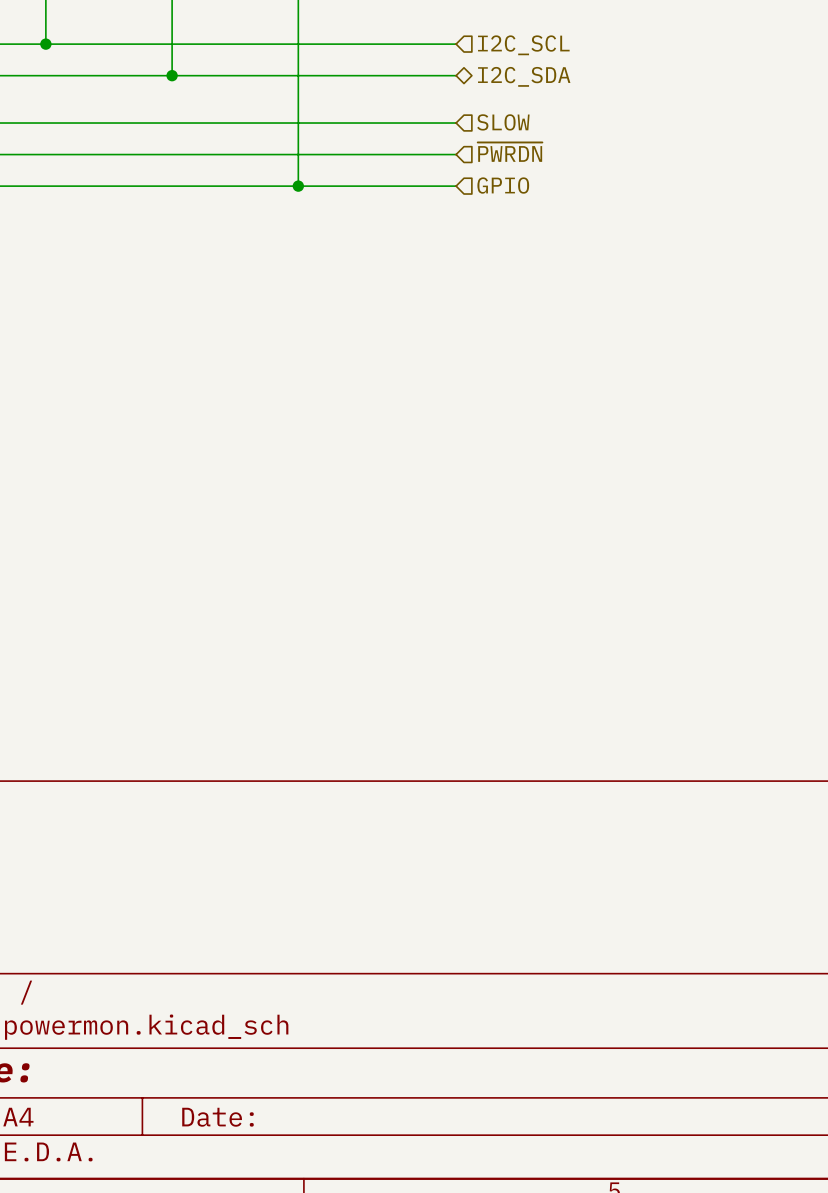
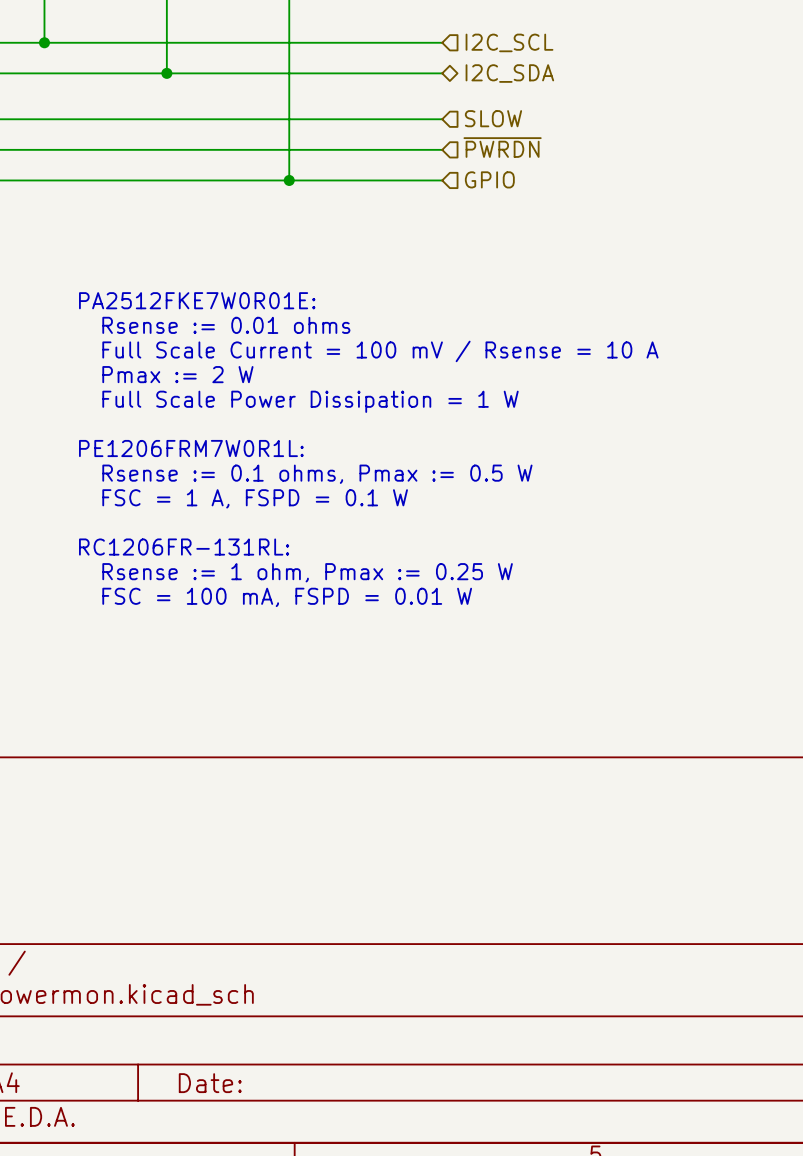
text: none -> PA2512FKE7W0R01E: (197, 300)
text: none -> Rsense := 0.01 ohms (226, 325)
text: none -> Full Scale Current = 100 mV / Rsense = 10 A (380, 351)
text: none -> Pmax := 2 W (177, 374)
text: none -> Full Scale Power Dissipation = 1 W (310, 401)
text: none -> PE1206FRM7W0R1L: (191, 448)
text: none -> Rsense := 0.1 ohms, Pmax := 0.5 W (317, 474)
text: none -> FSC = 1 A, FSPD = 0.1 W (255, 498)
text: none -> RC1206FR-131RL: (184, 547)
text: none -> Rsense := 1 ohm, Pmax := 0.25 W (307, 572)
text: none -> FSC = 100 mA, FSPD = 0.01 W (287, 597)

